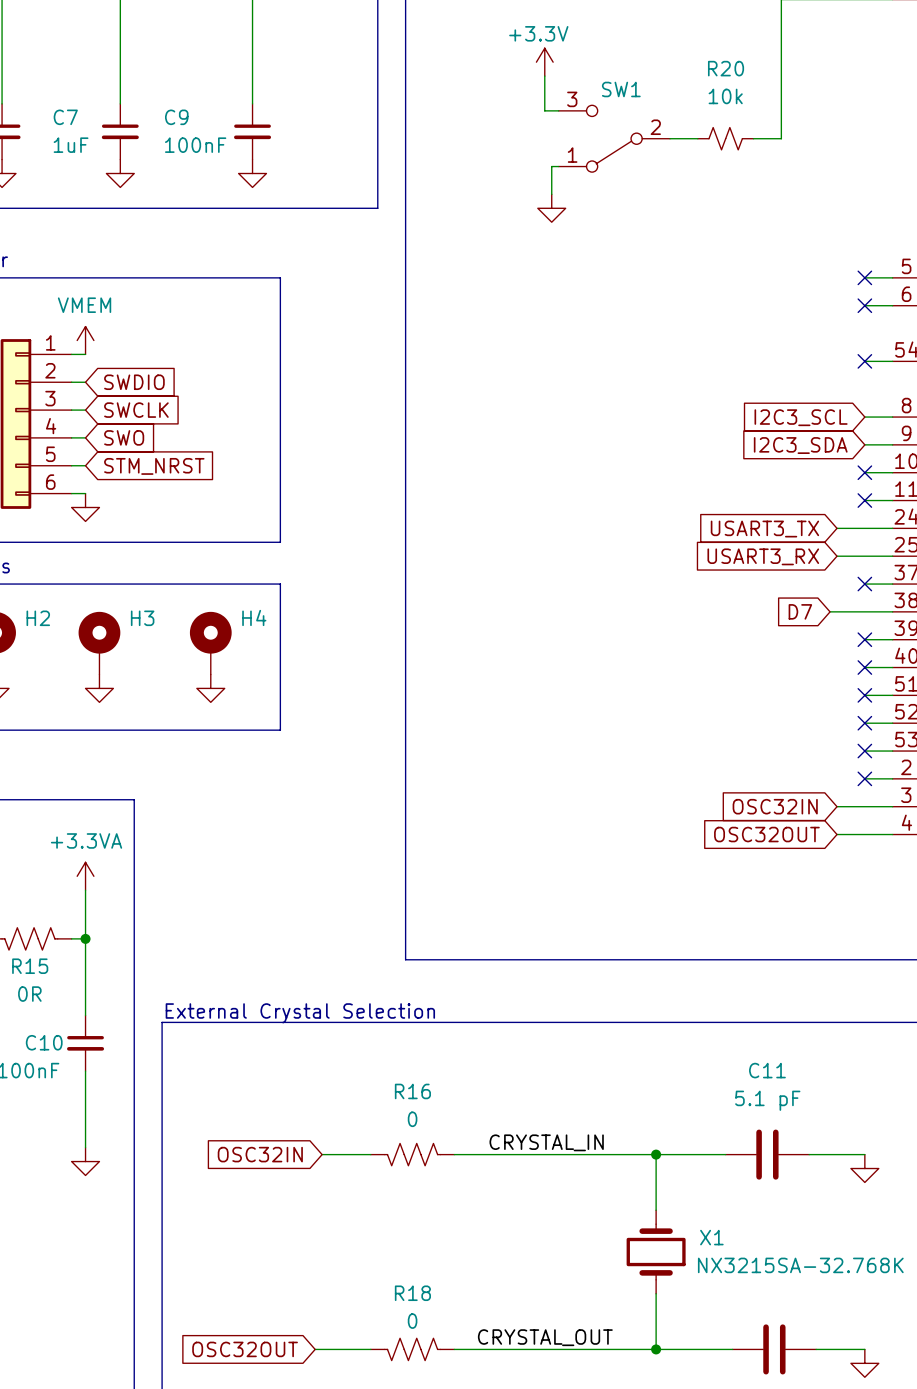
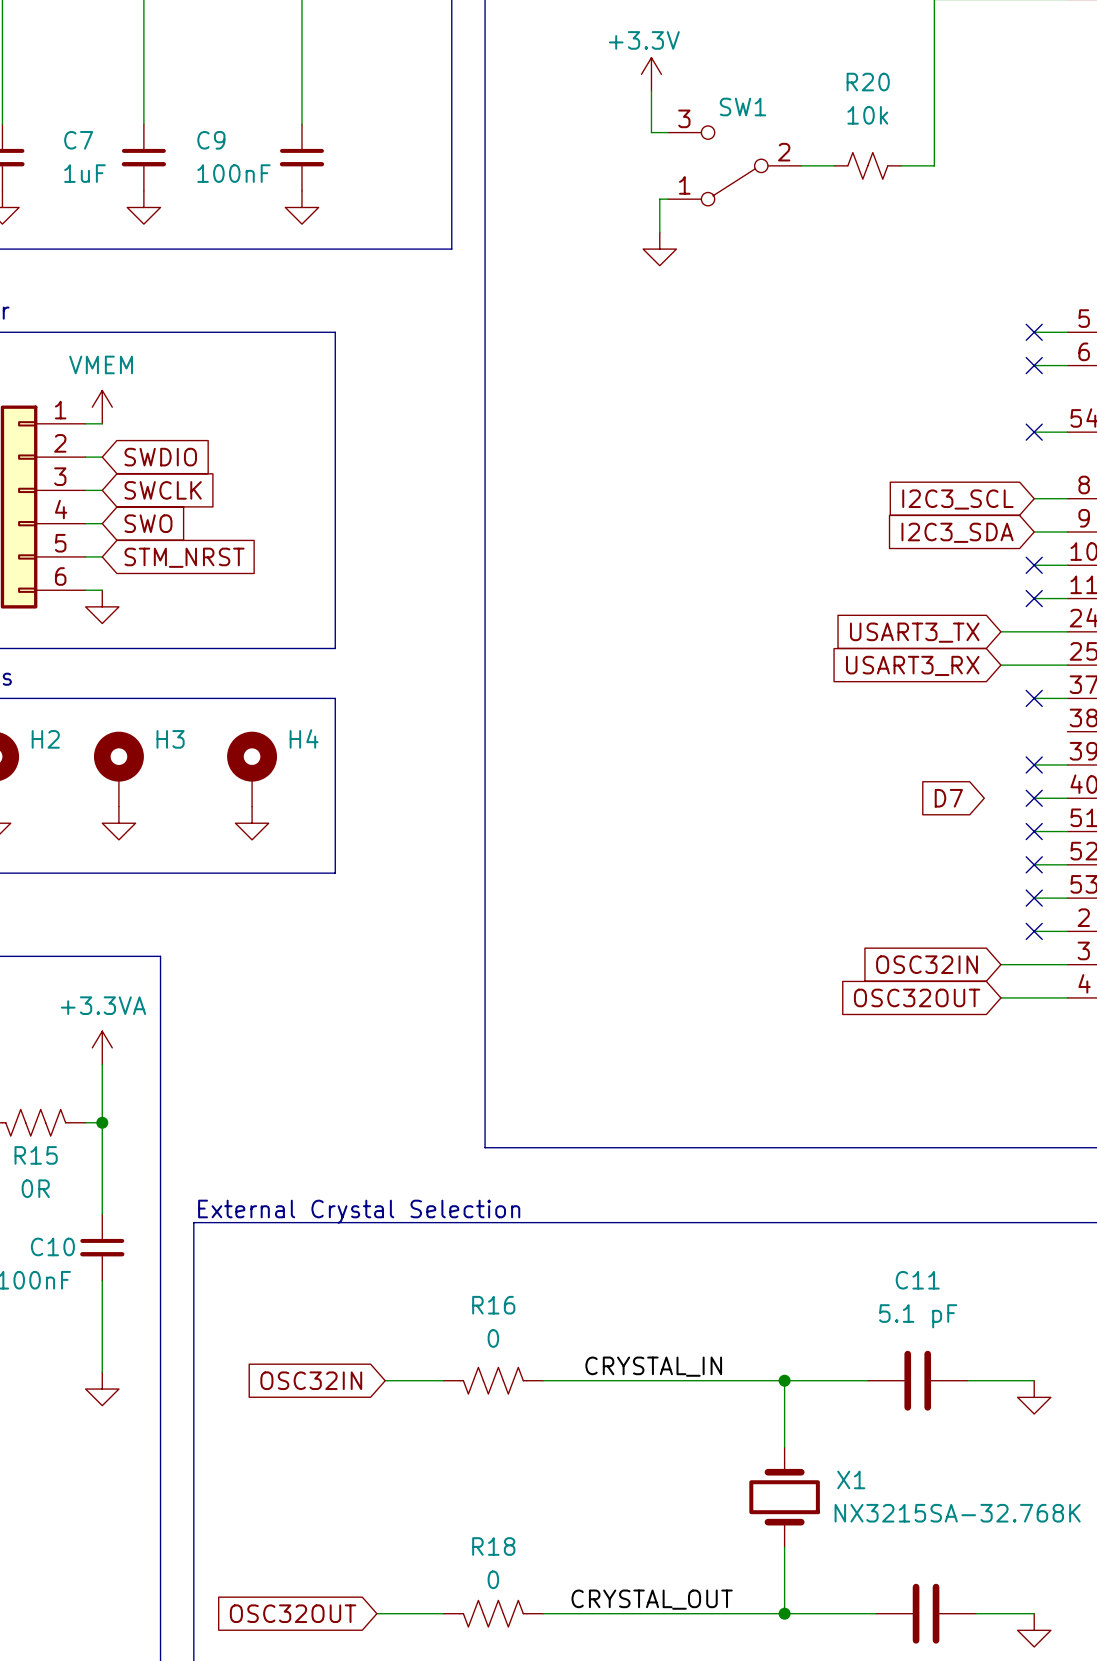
global label position: D7 (800, 611) -> D7 (948, 798)
wire: (830, 611) (892, 611) -> none

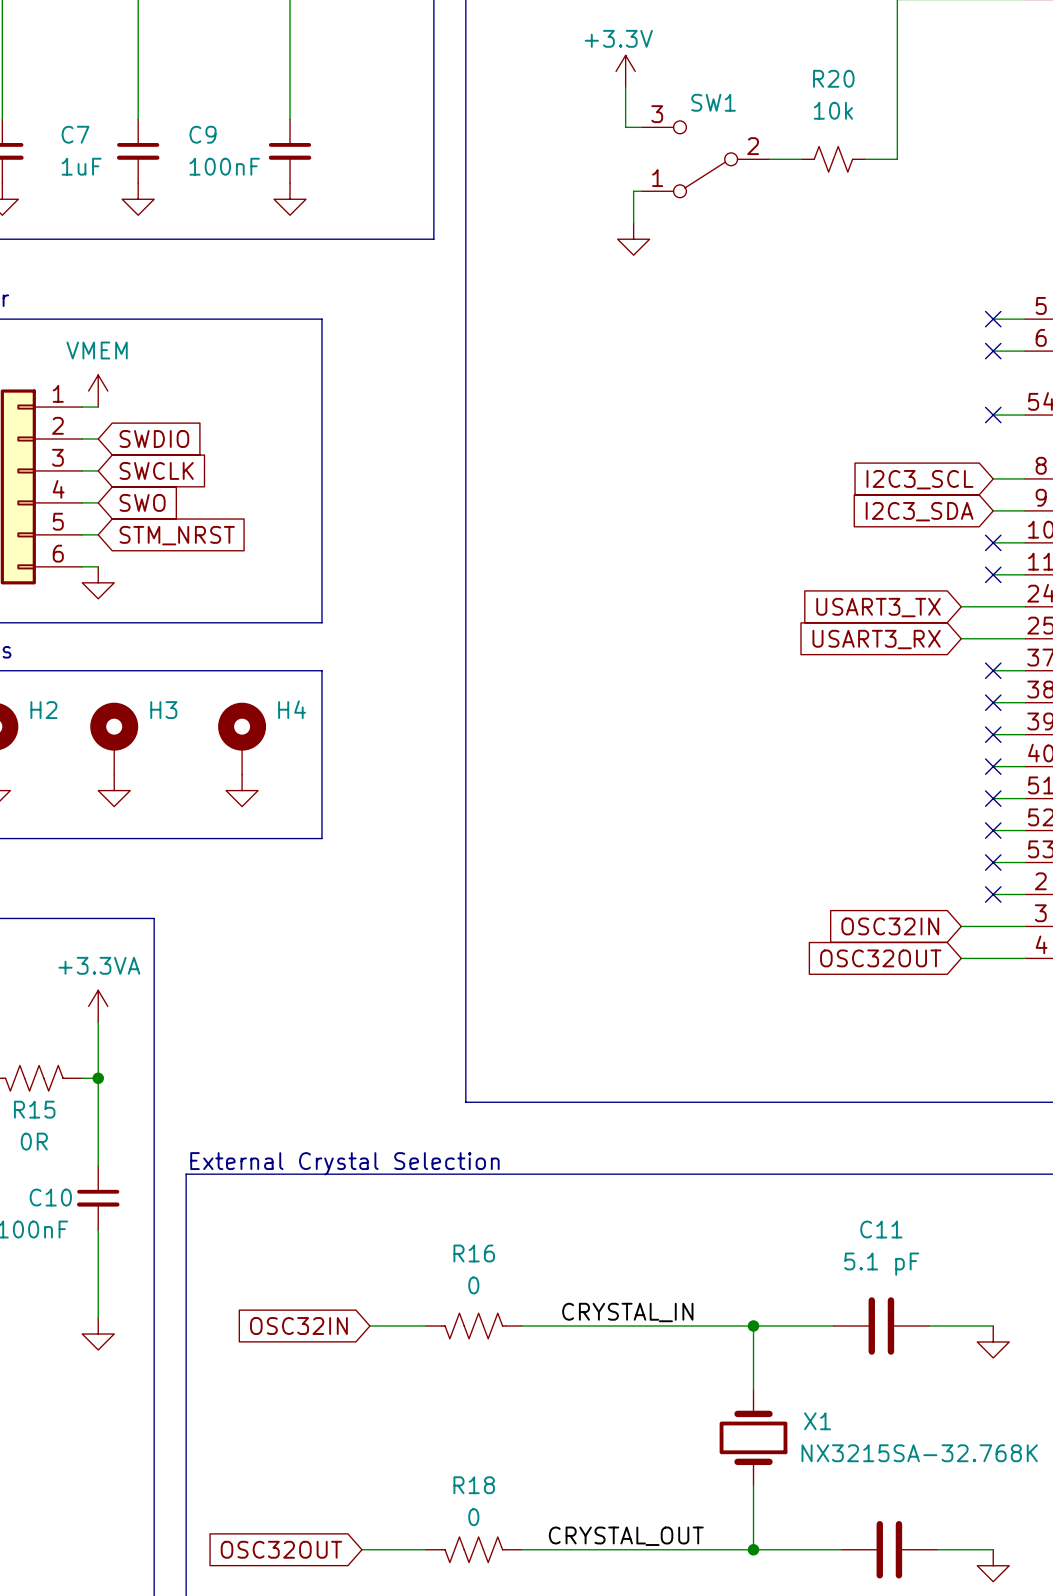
wire: none -> (993, 702) (1025, 702)
no-connect mark: none -> (993, 702)
global label: D7 (948, 798) -> none

